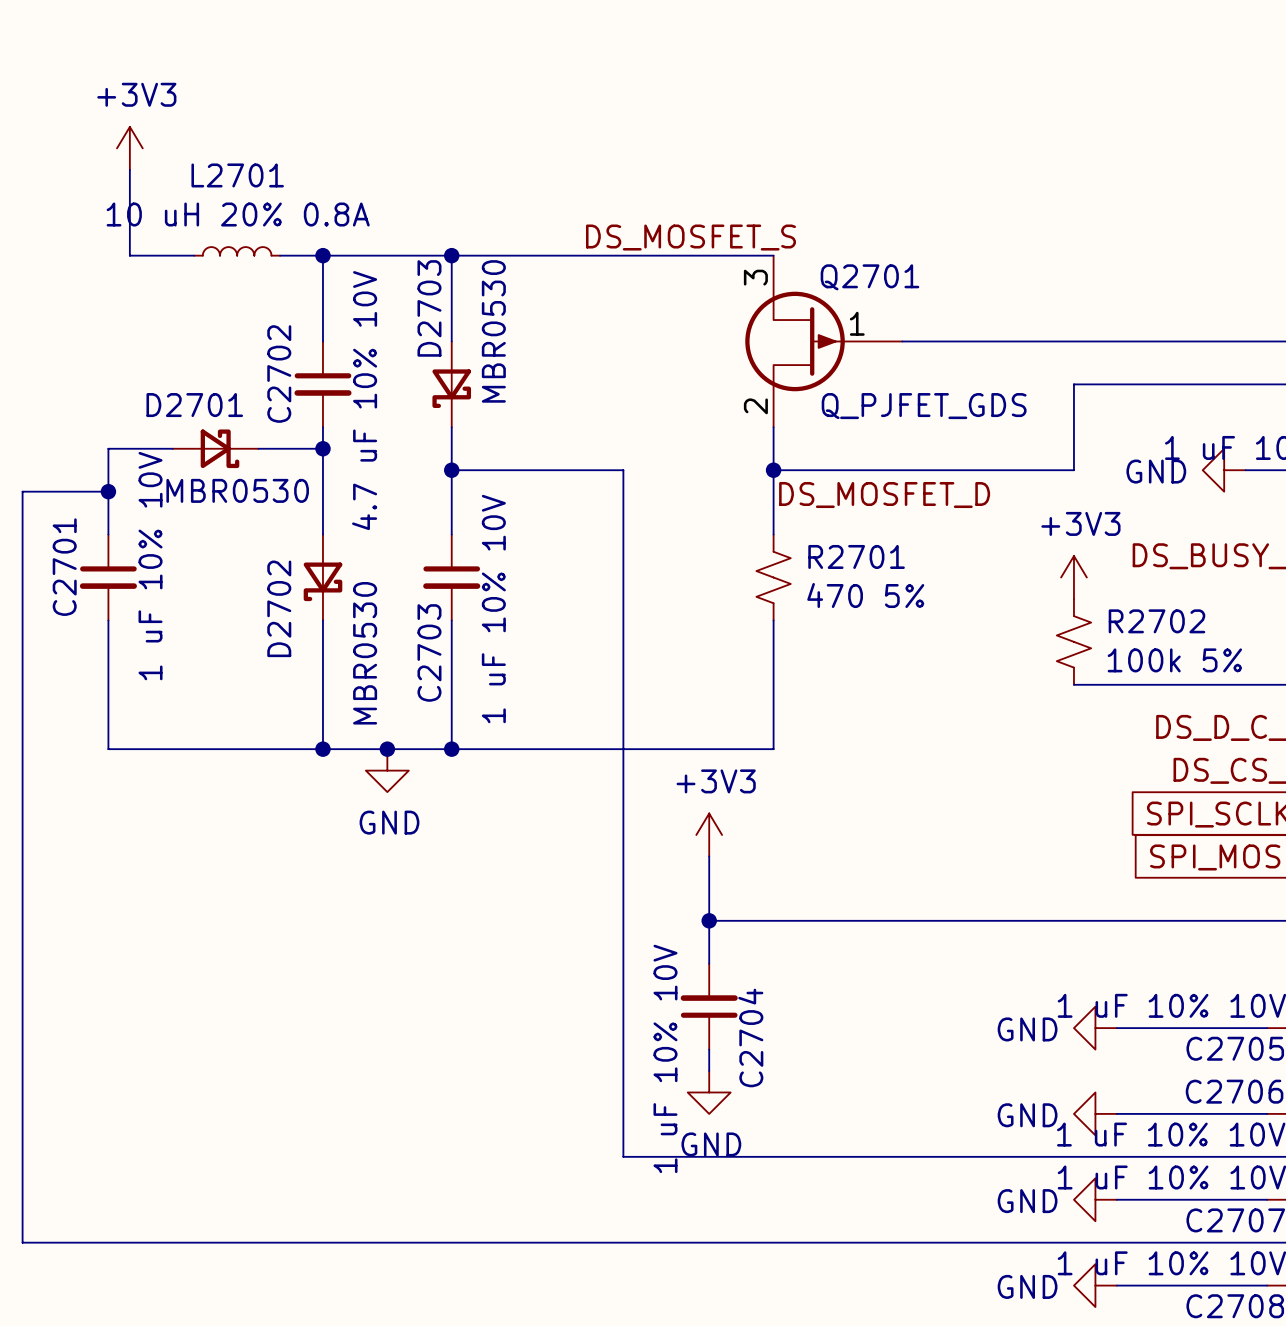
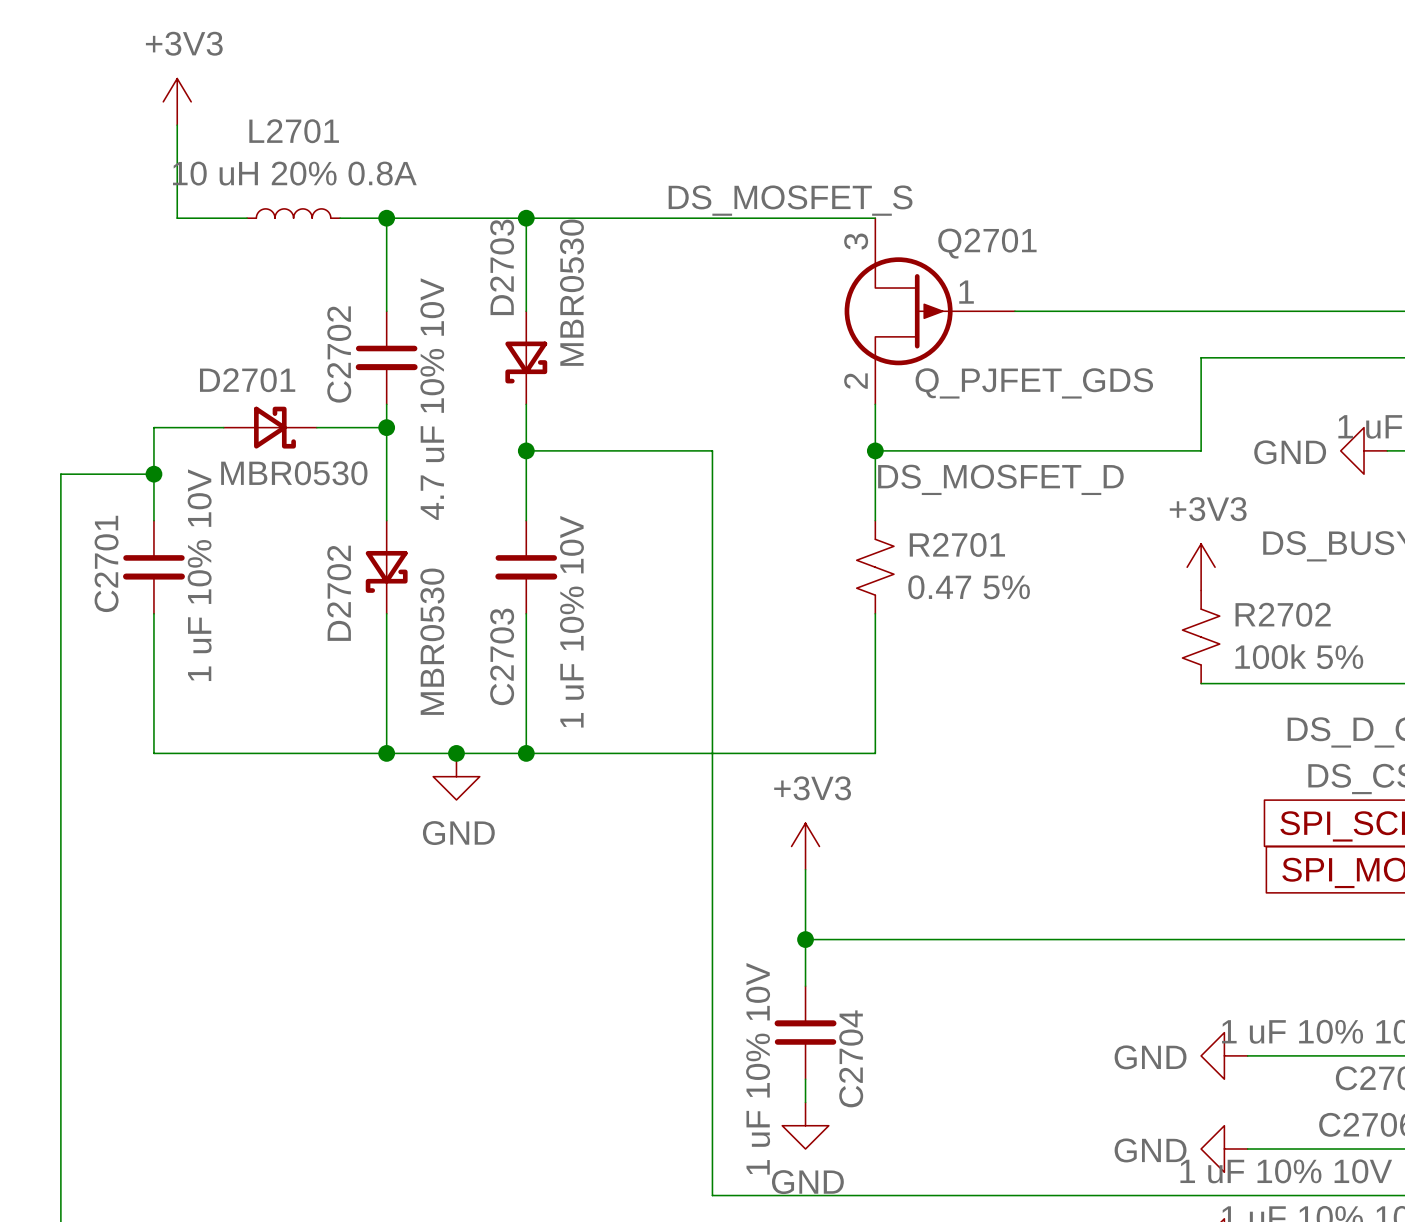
R2701 value: 470 5% (865, 595) -> 0.47 5% (969, 587)

